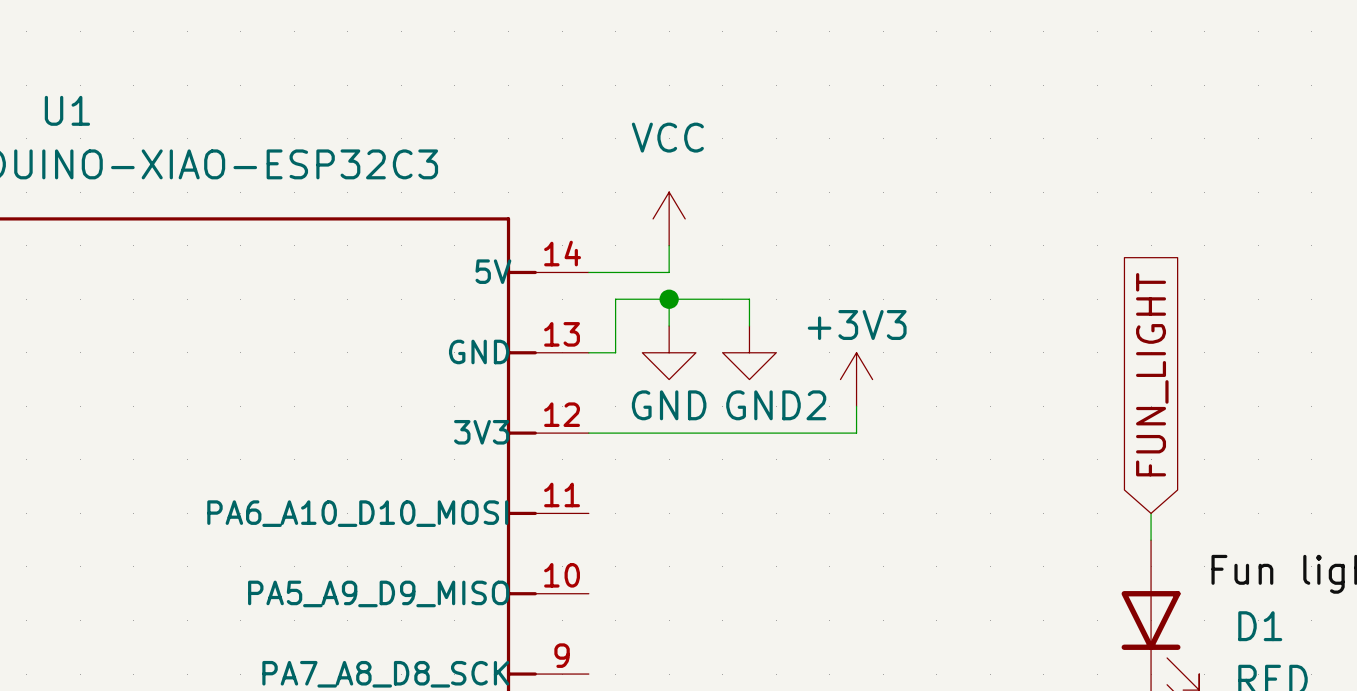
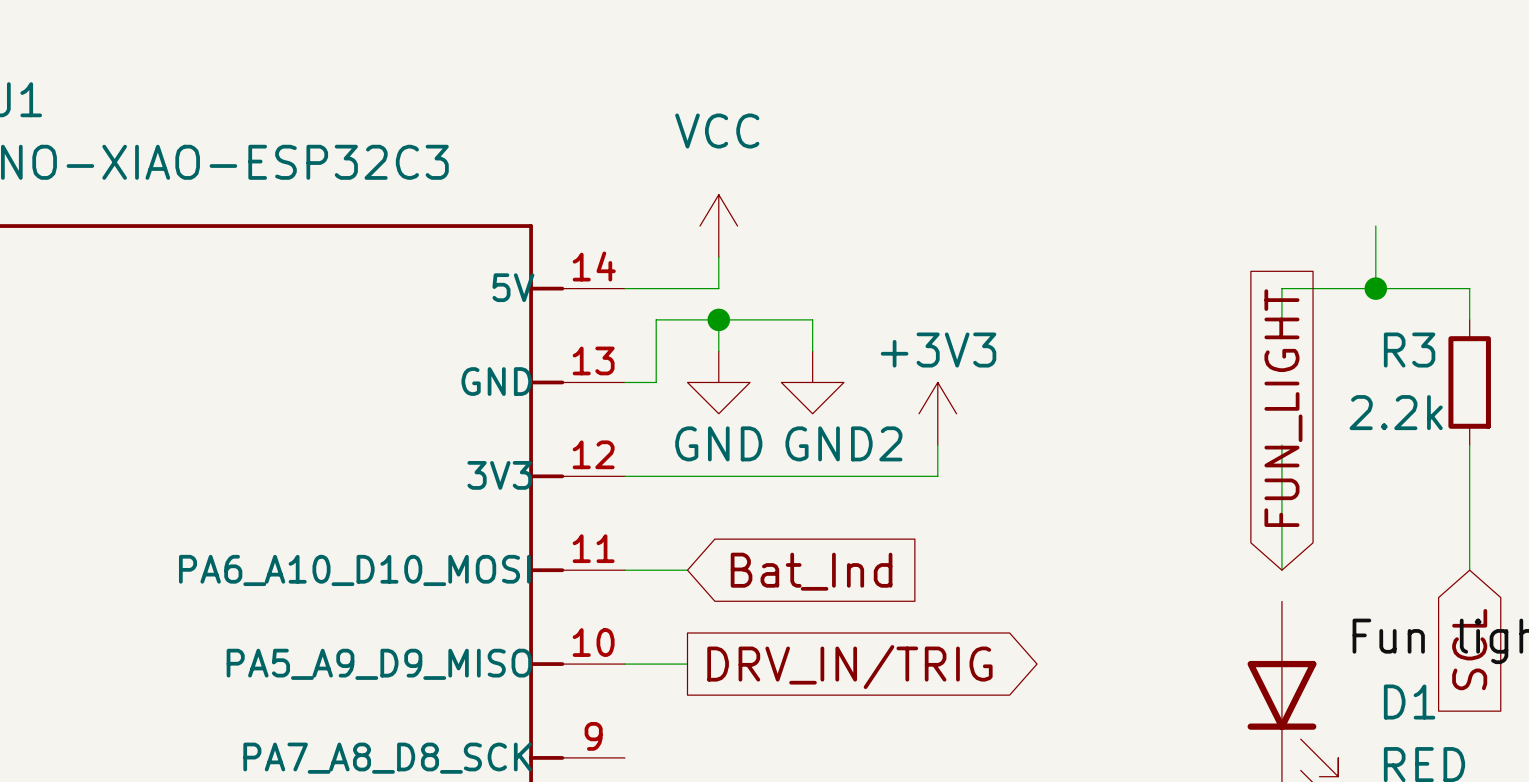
wire: none -> (1375, 226) (1375, 288)
junction: none -> (1375, 288)
wire: none -> (1281, 319) (1281, 288) (1469, 288) (1469, 319)
R3: none -> 2.2k (1469, 382)
wire: none -> (1469, 445) (1469, 570)
wire: none -> (624, 570) (687, 570)
wire: (1151, 513) (1151, 540) -> (1281, 570) (1281, 445)
global label: none -> Bat_Ind (811, 571)
global label: none -> SCL (1469, 649)
wire: none -> (624, 664) (687, 664)
global label: none -> DRV_IN/TRIG (849, 667)

